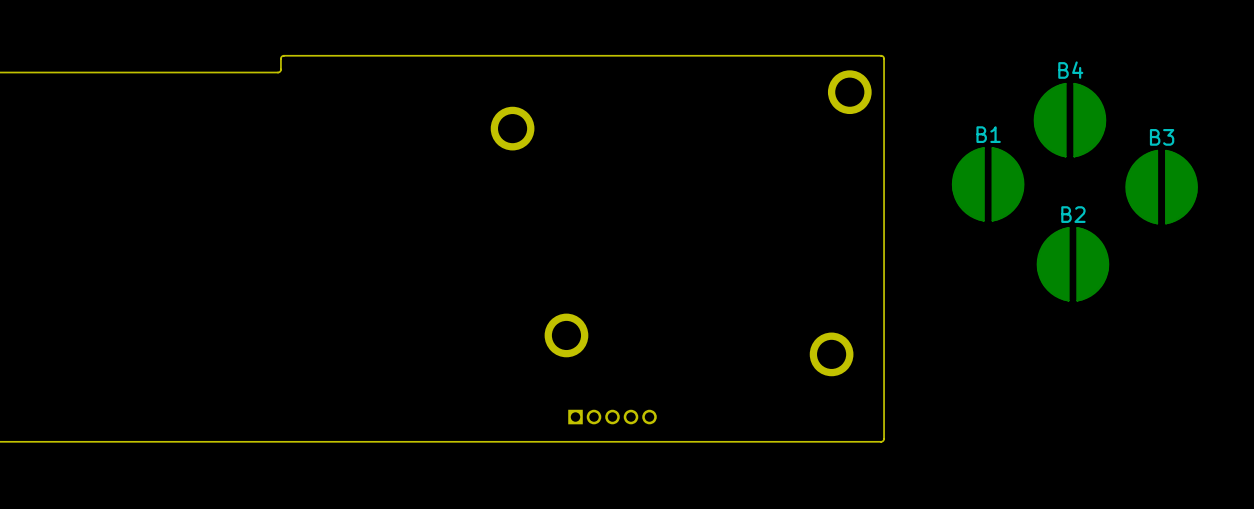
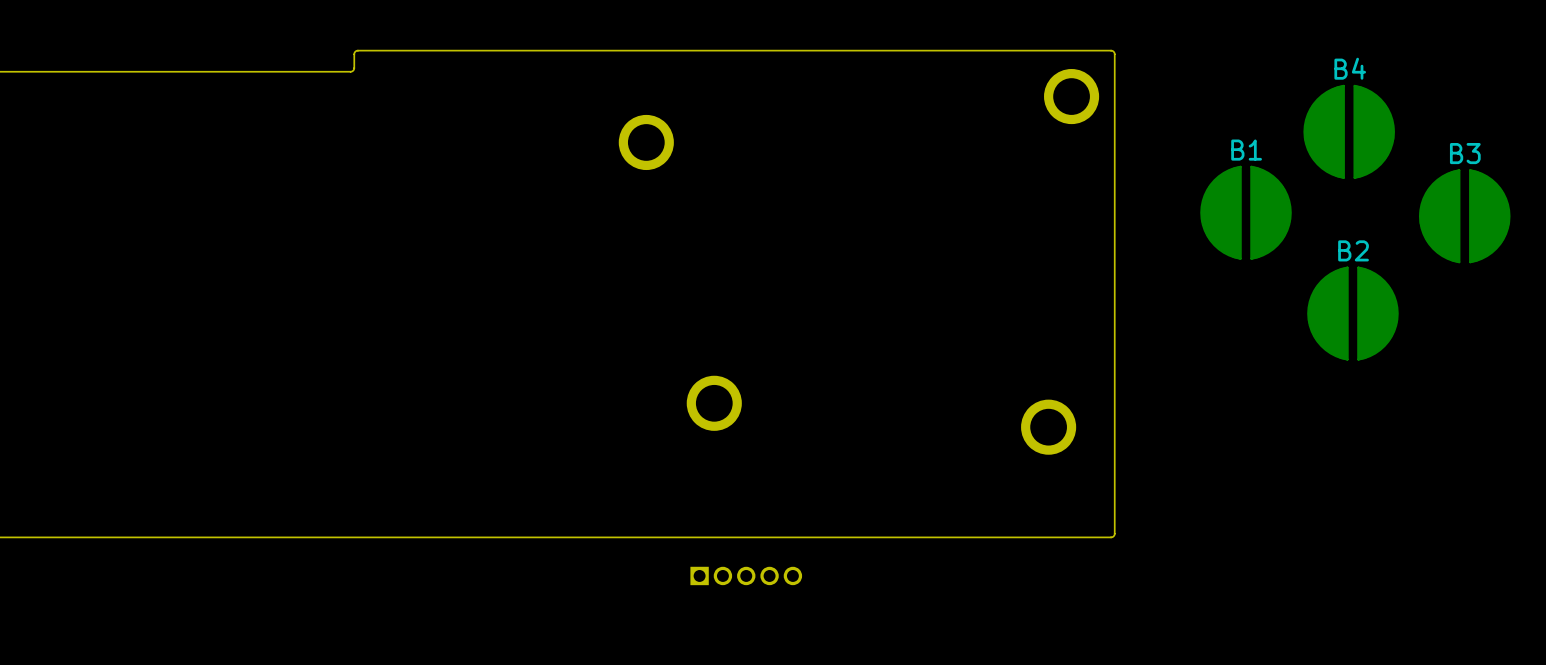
part position: (612, 417) -> (746, 575)

